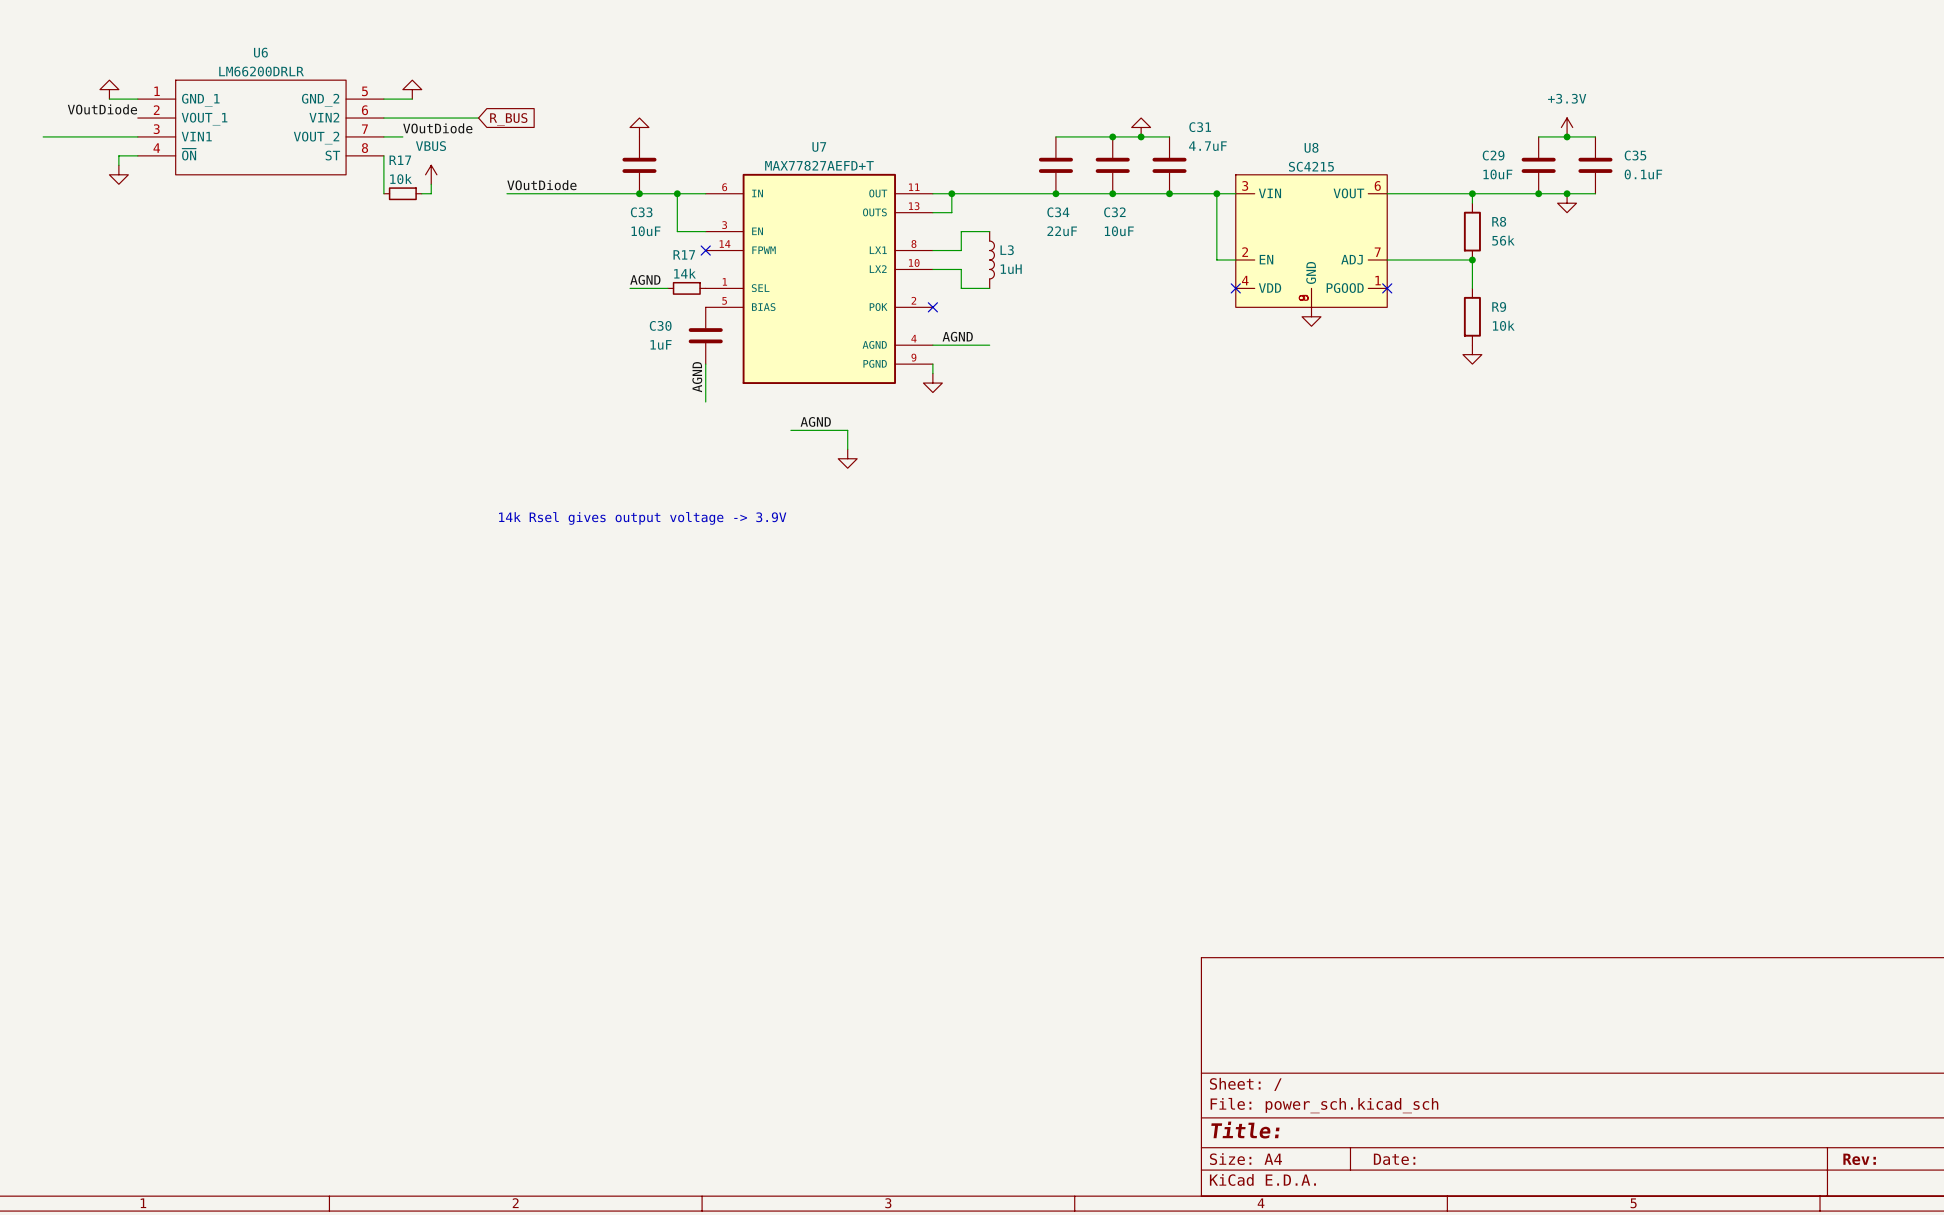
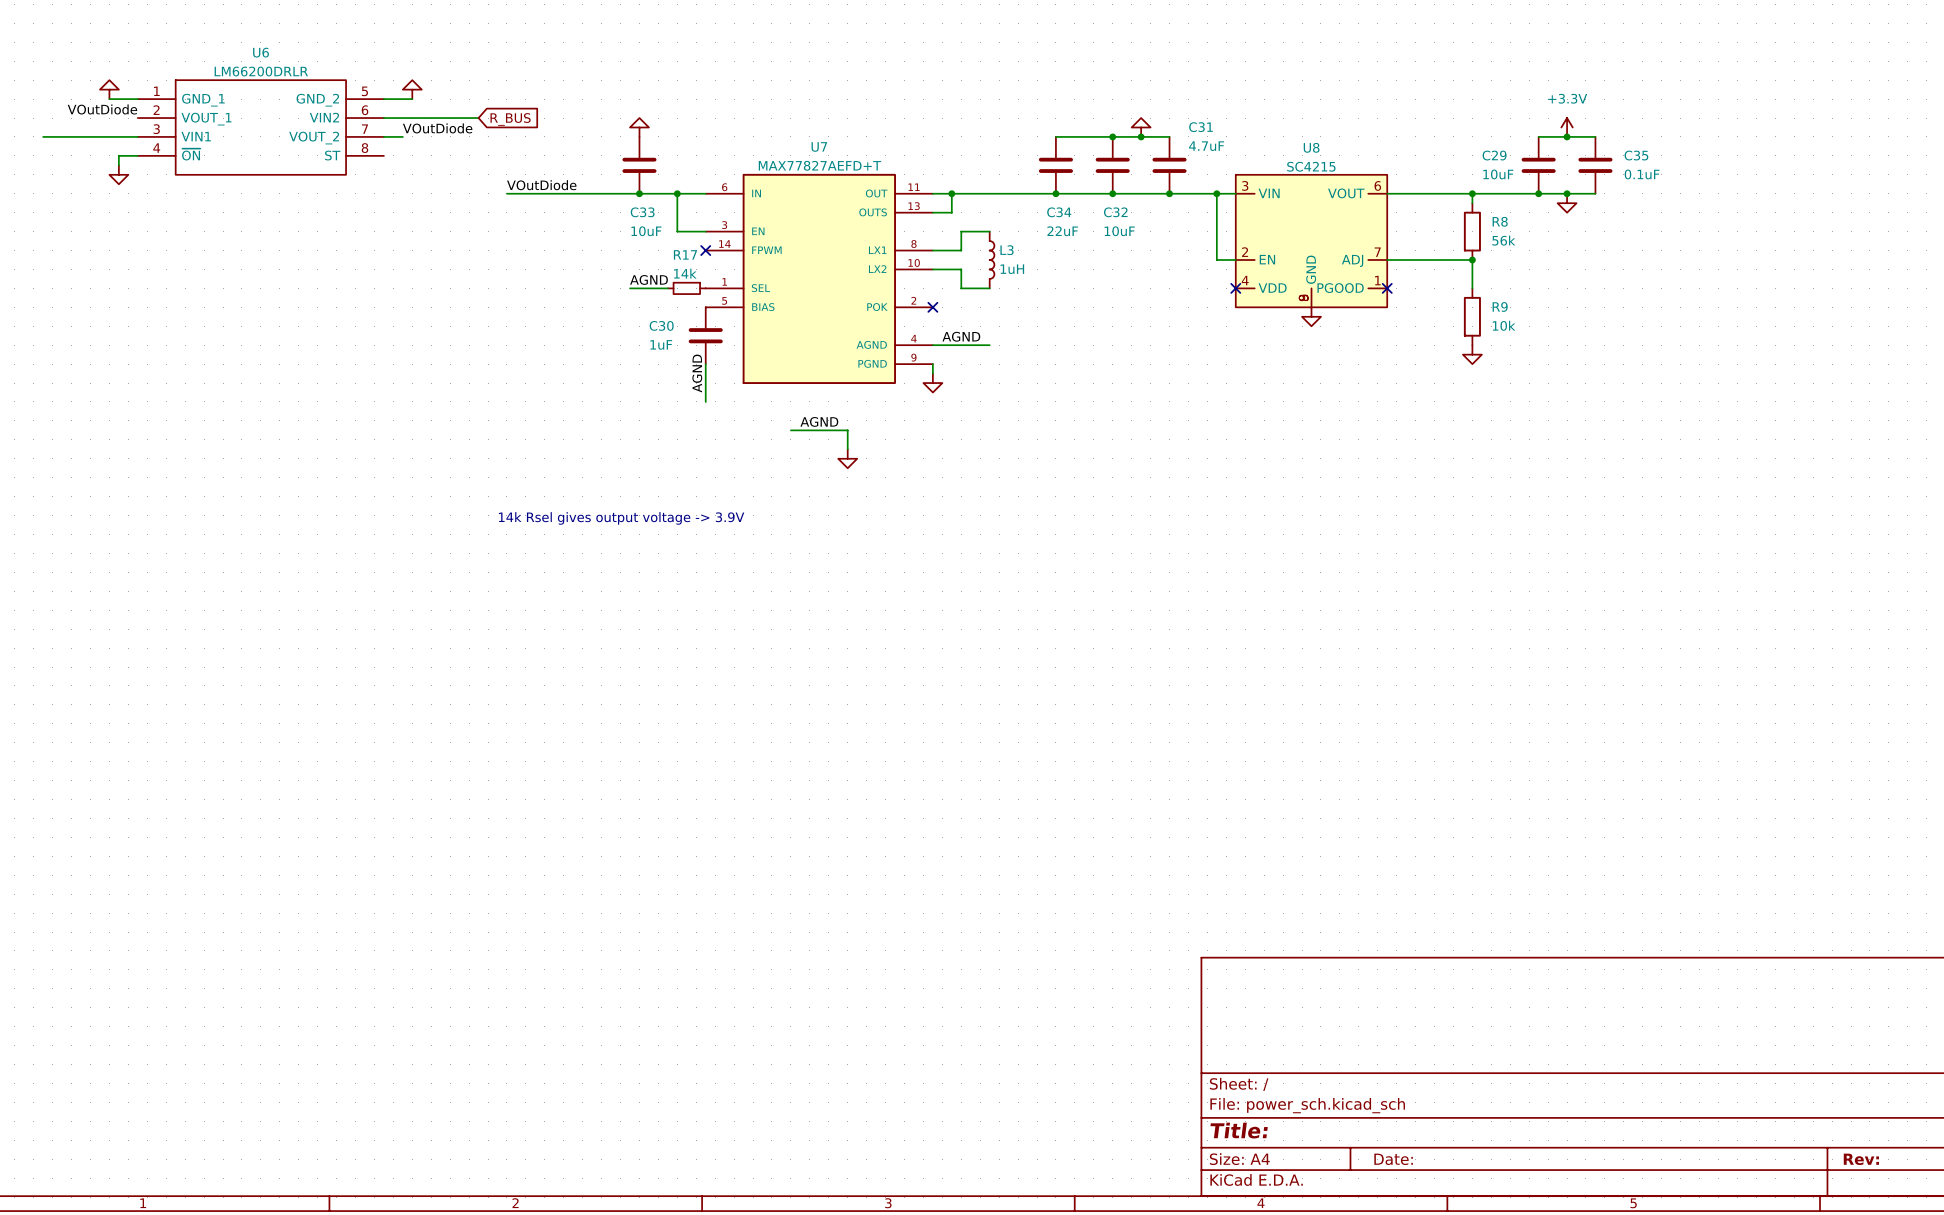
wire: (383, 155) (383, 193) -> none
power symbol: VBUS (431, 174) -> none
wire: (431, 184) (431, 193) (421, 193) -> none
R17: 10k (402, 193) -> none

